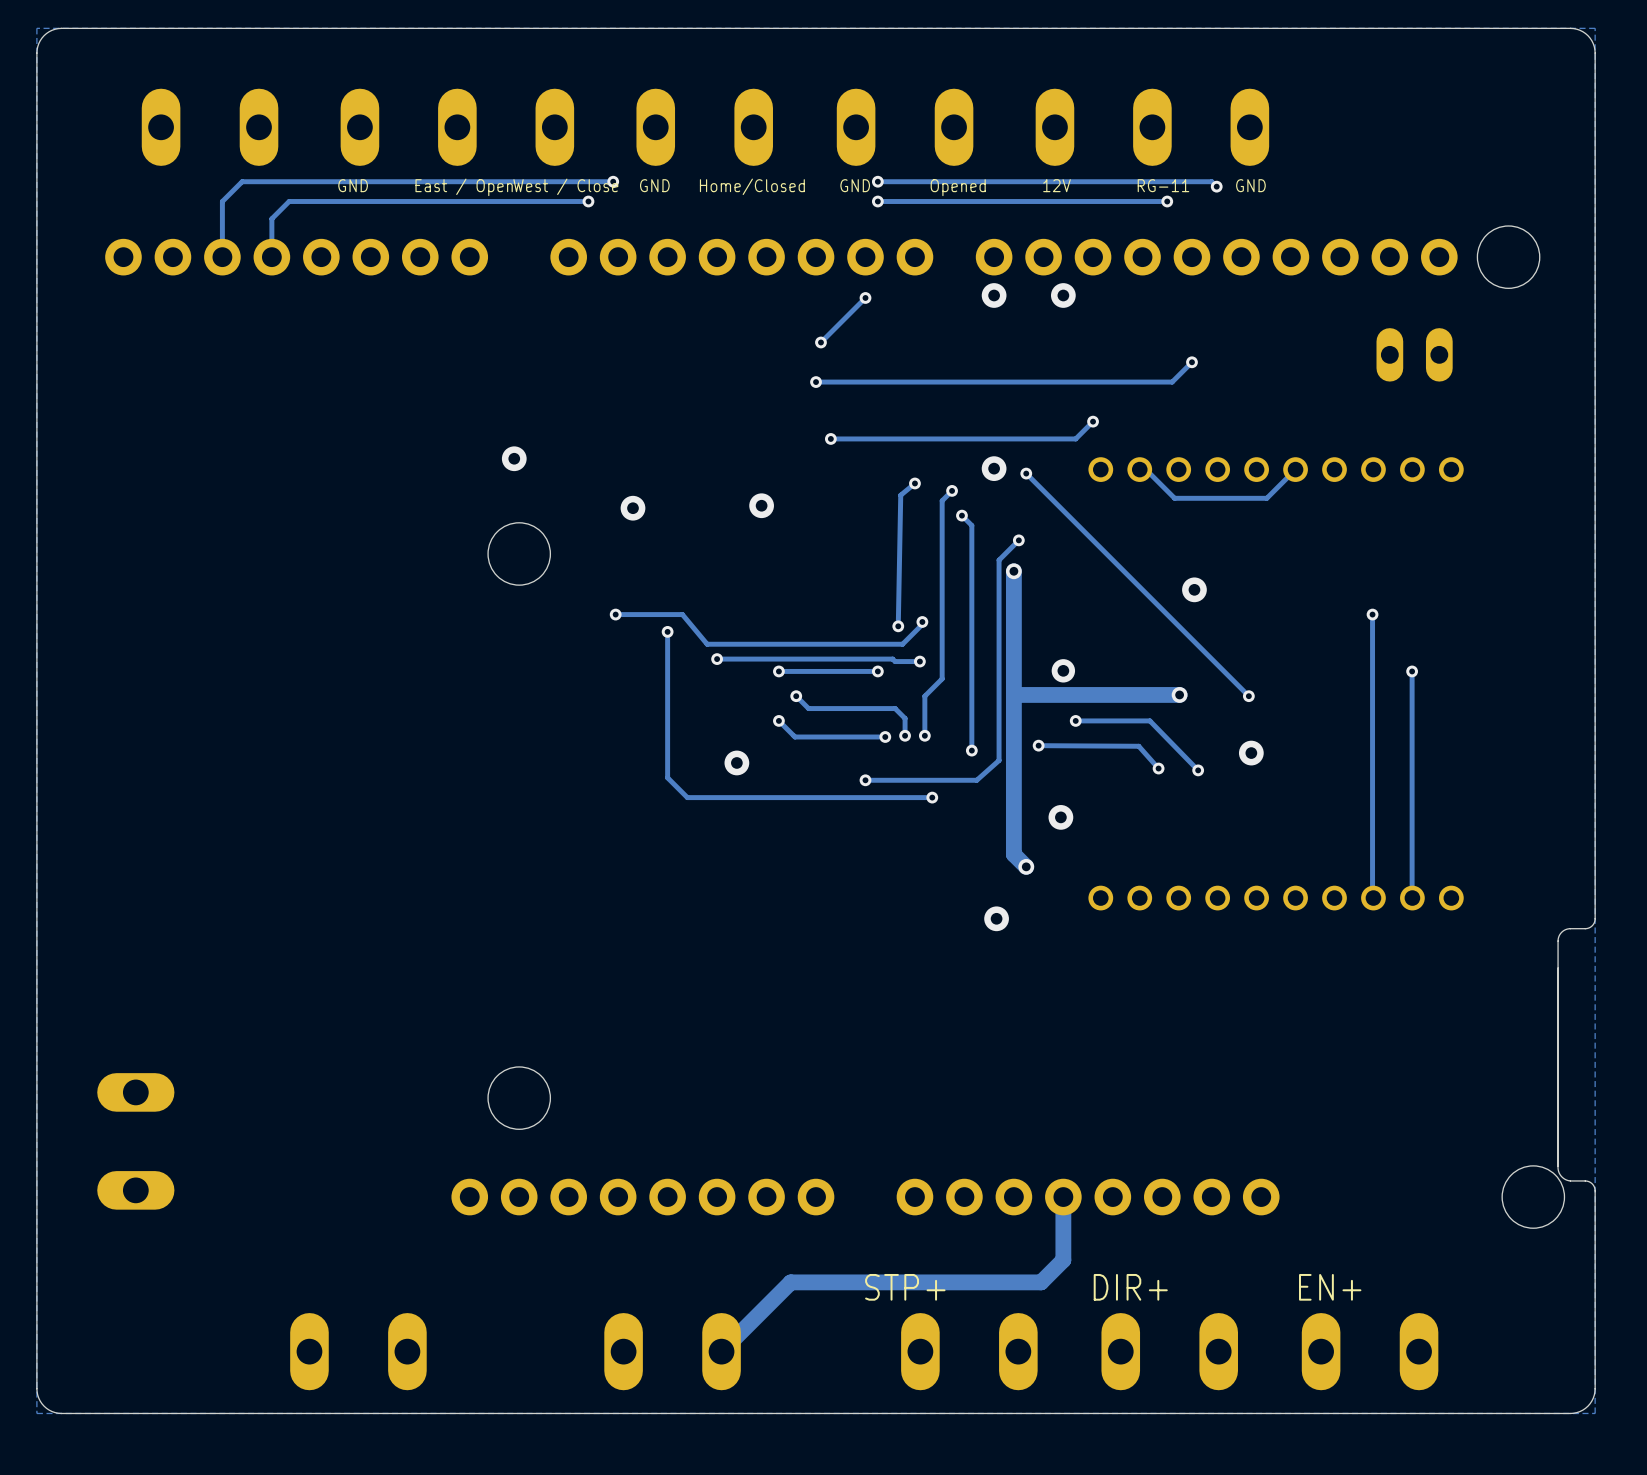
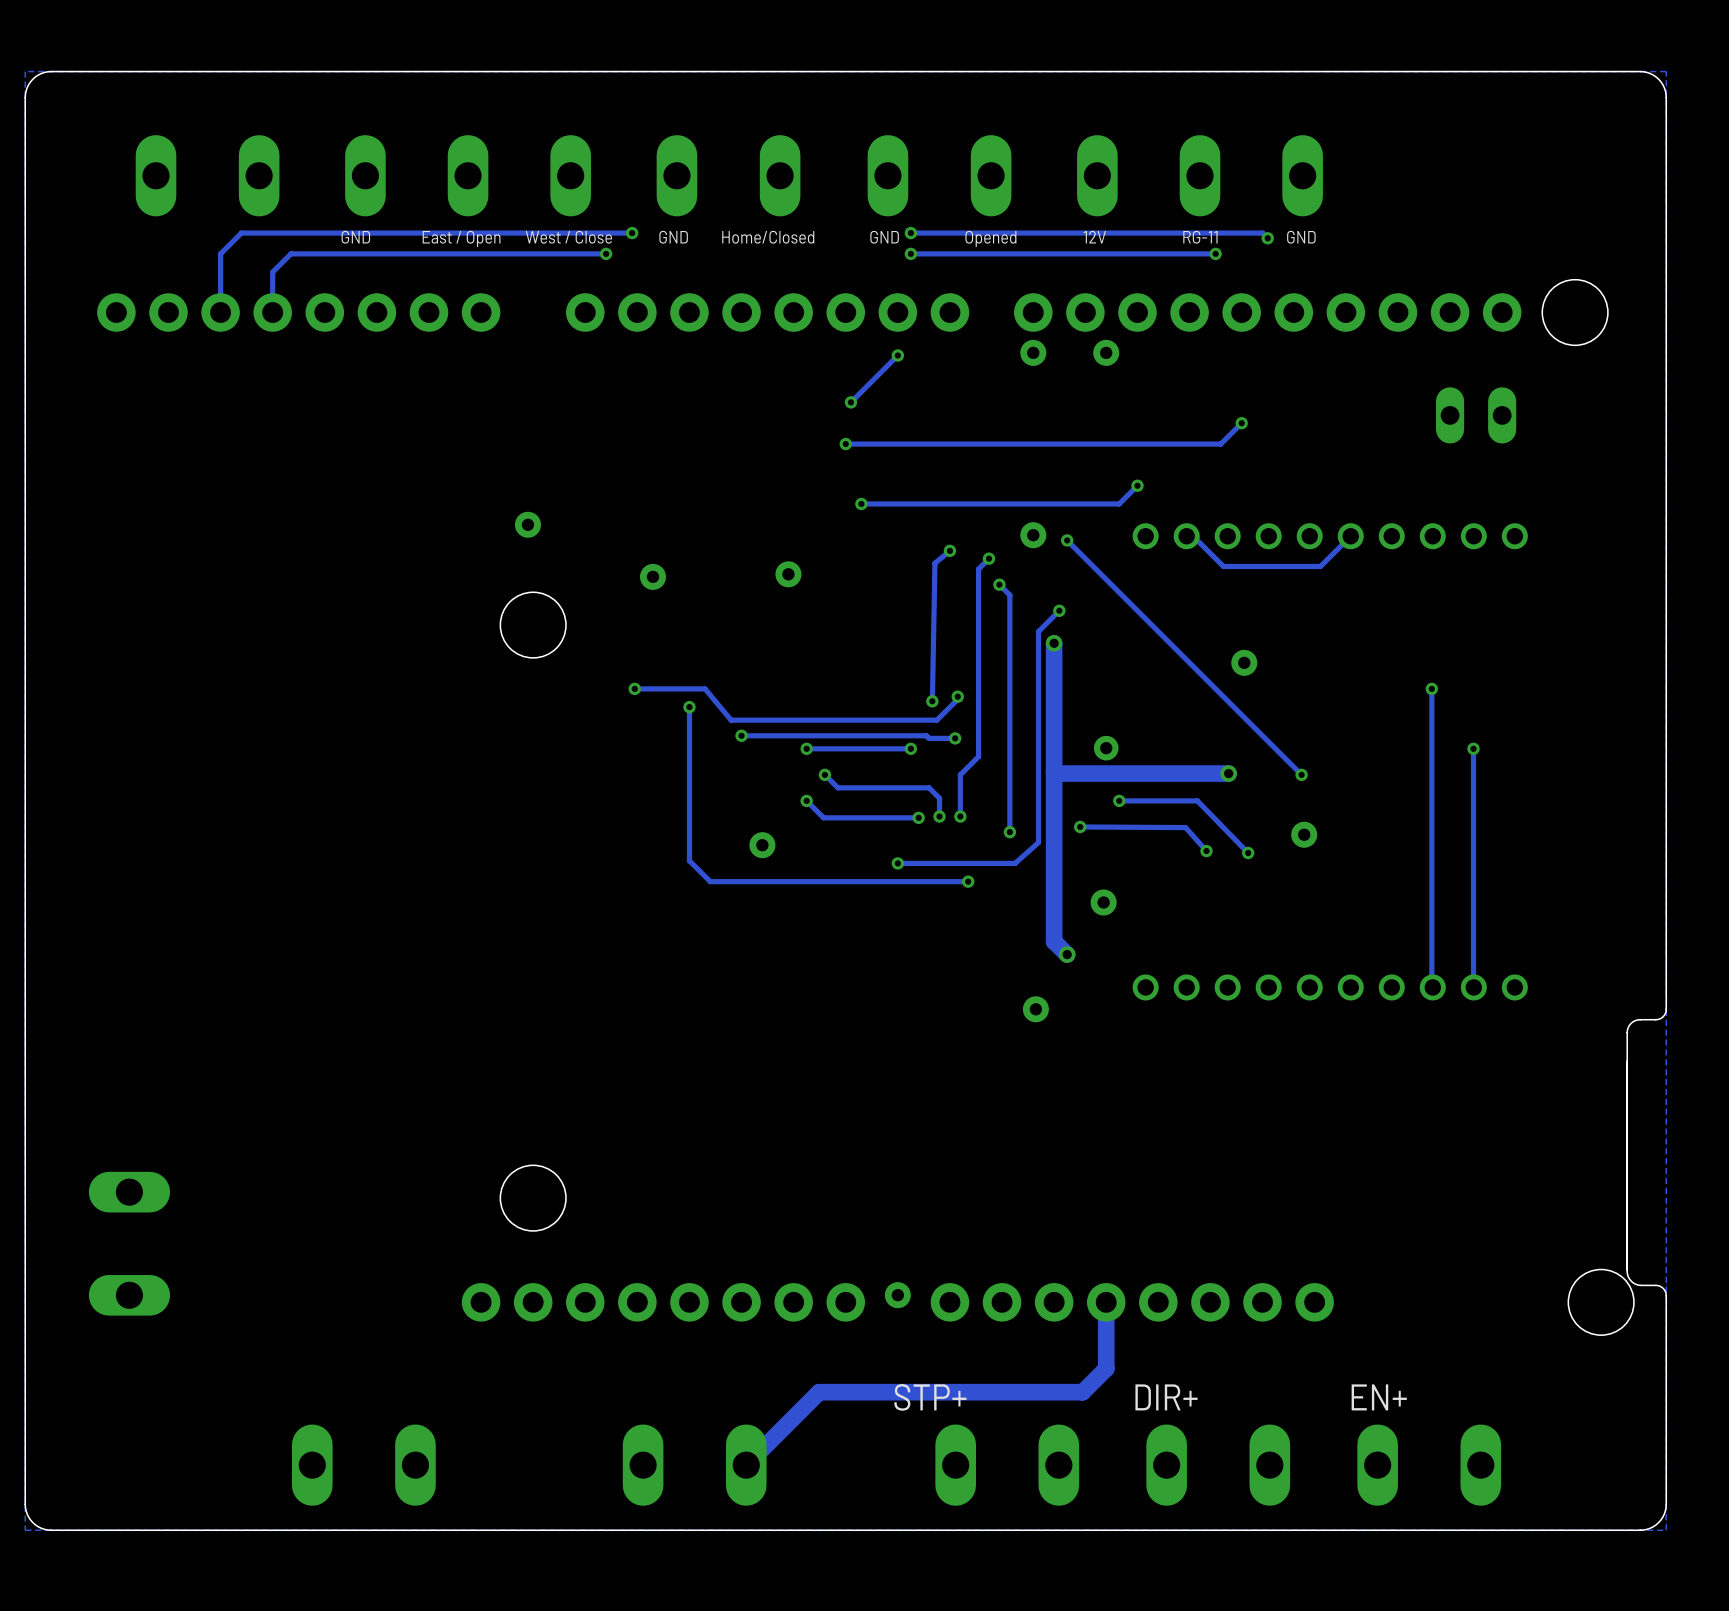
via: none -> (897, 1295)

